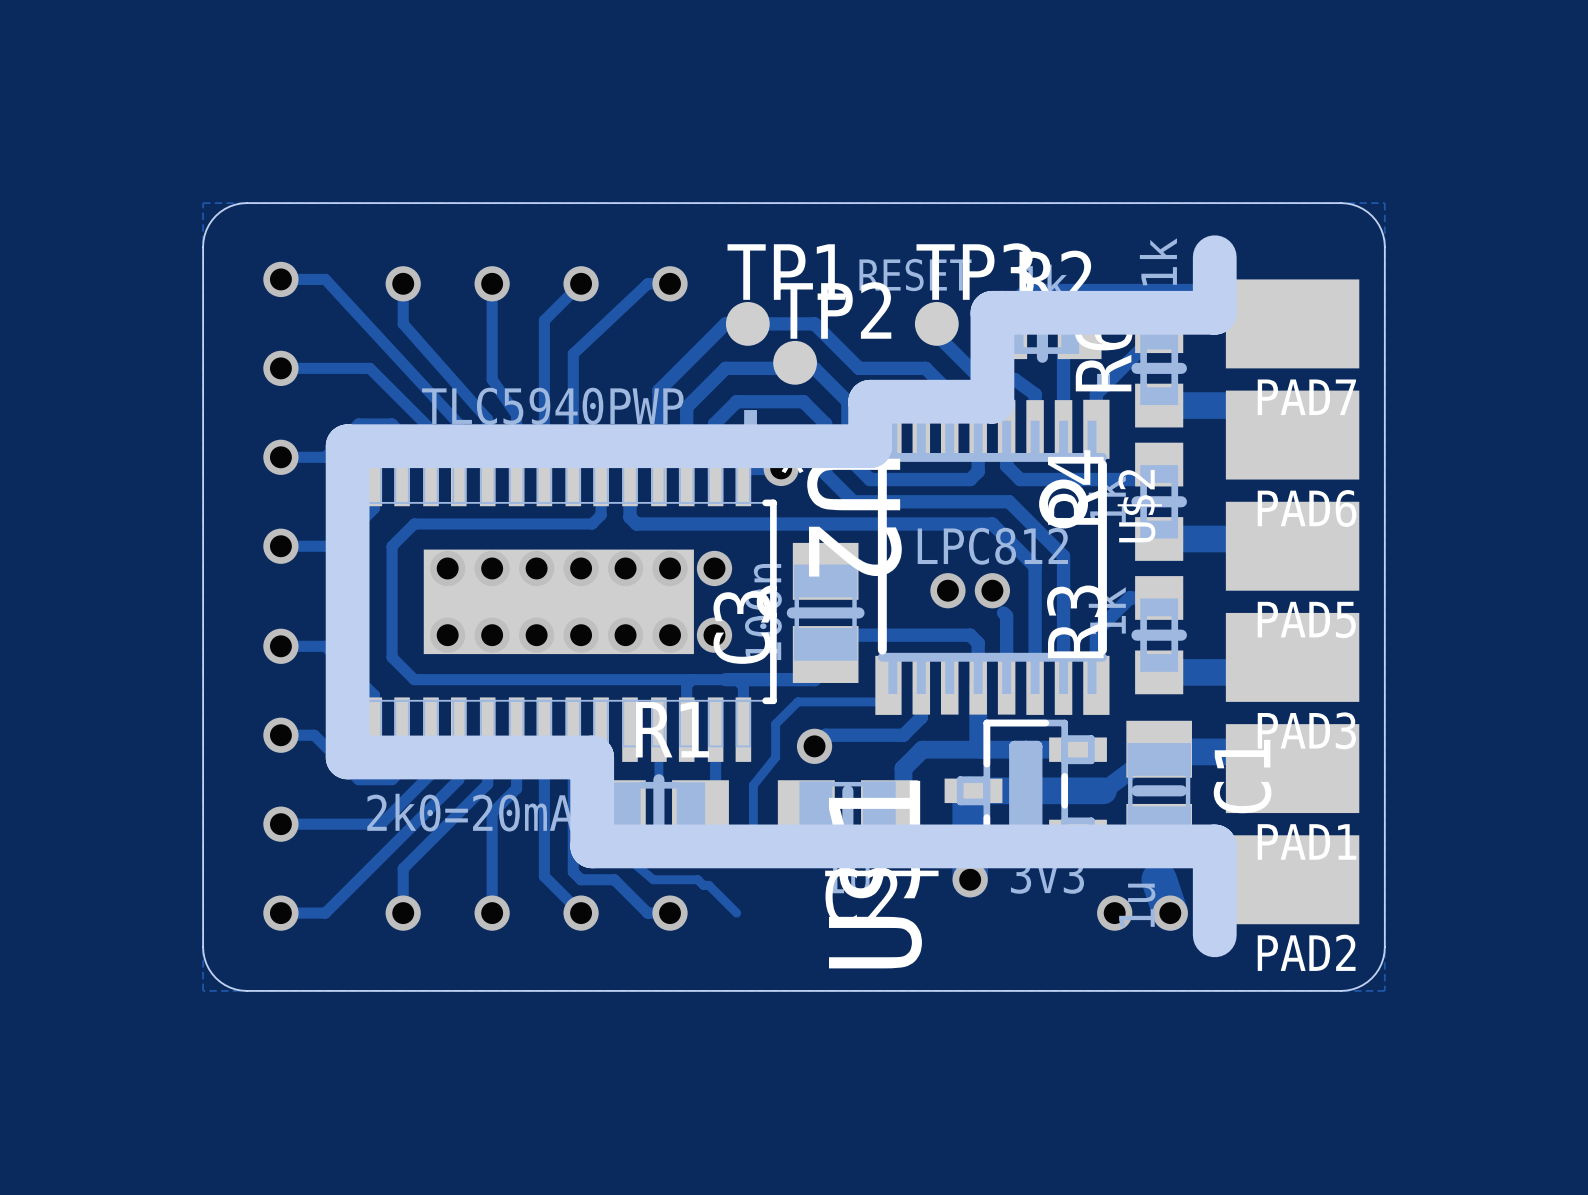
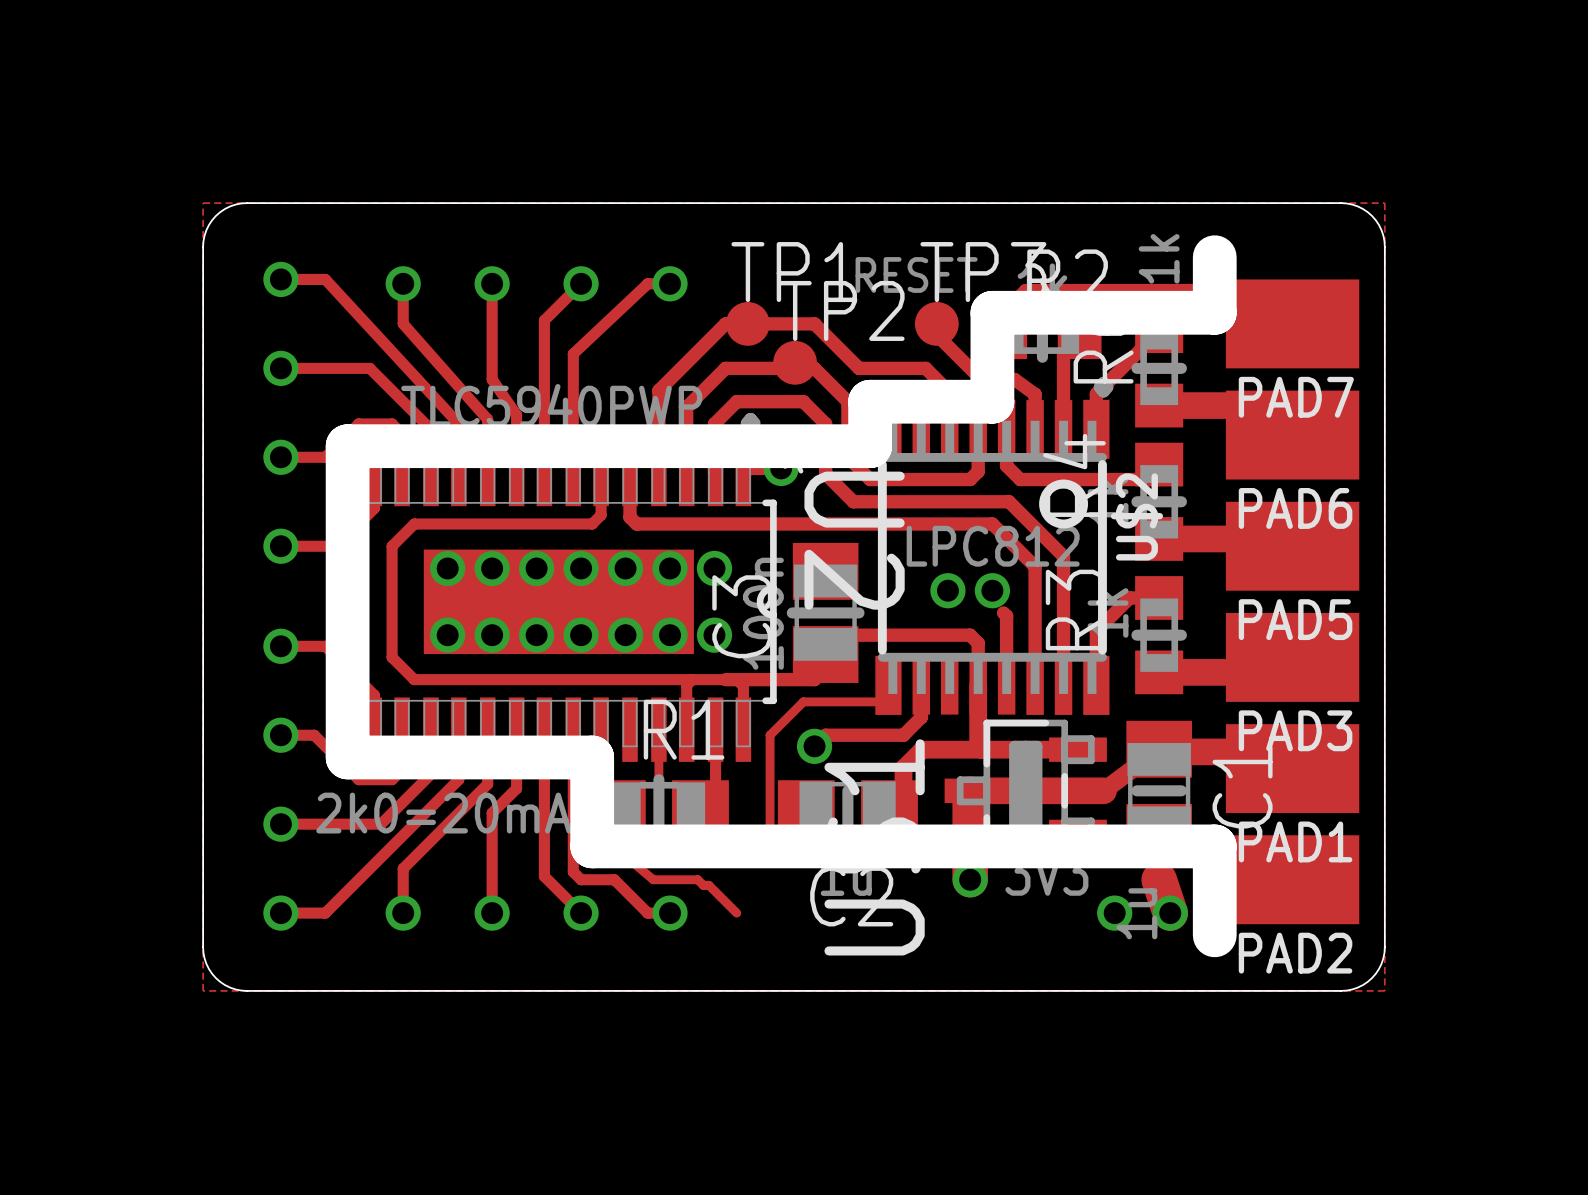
track: (803, 701) (797, 701) (775, 724) (775, 757) (753, 785) (753, 846) -> (803, 701) (770, 735) (770, 829) (753, 846)

